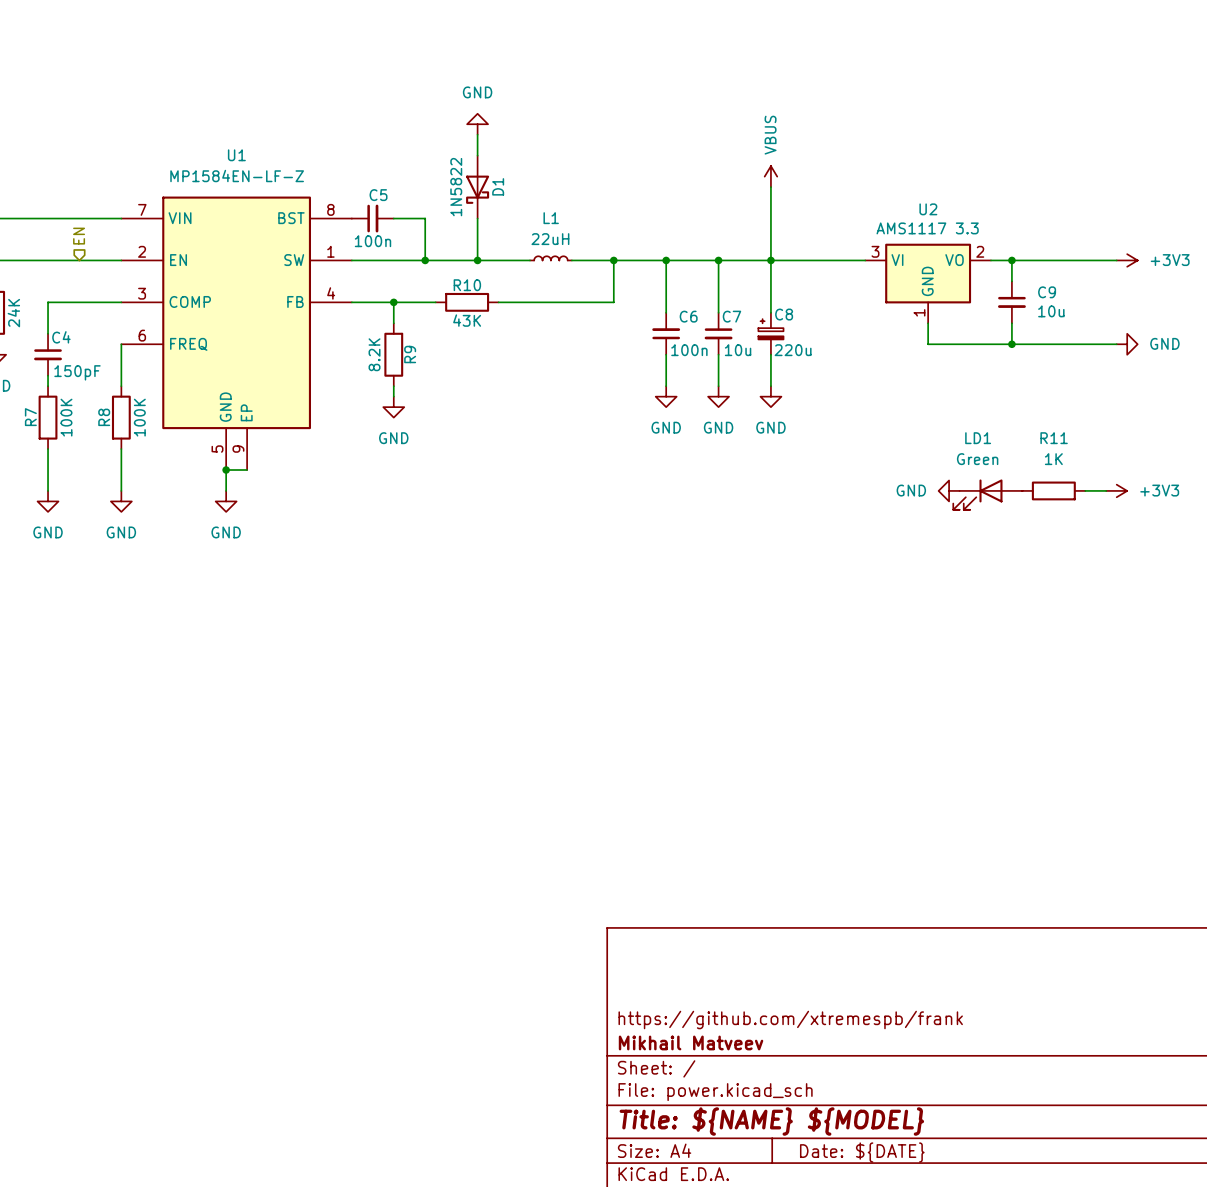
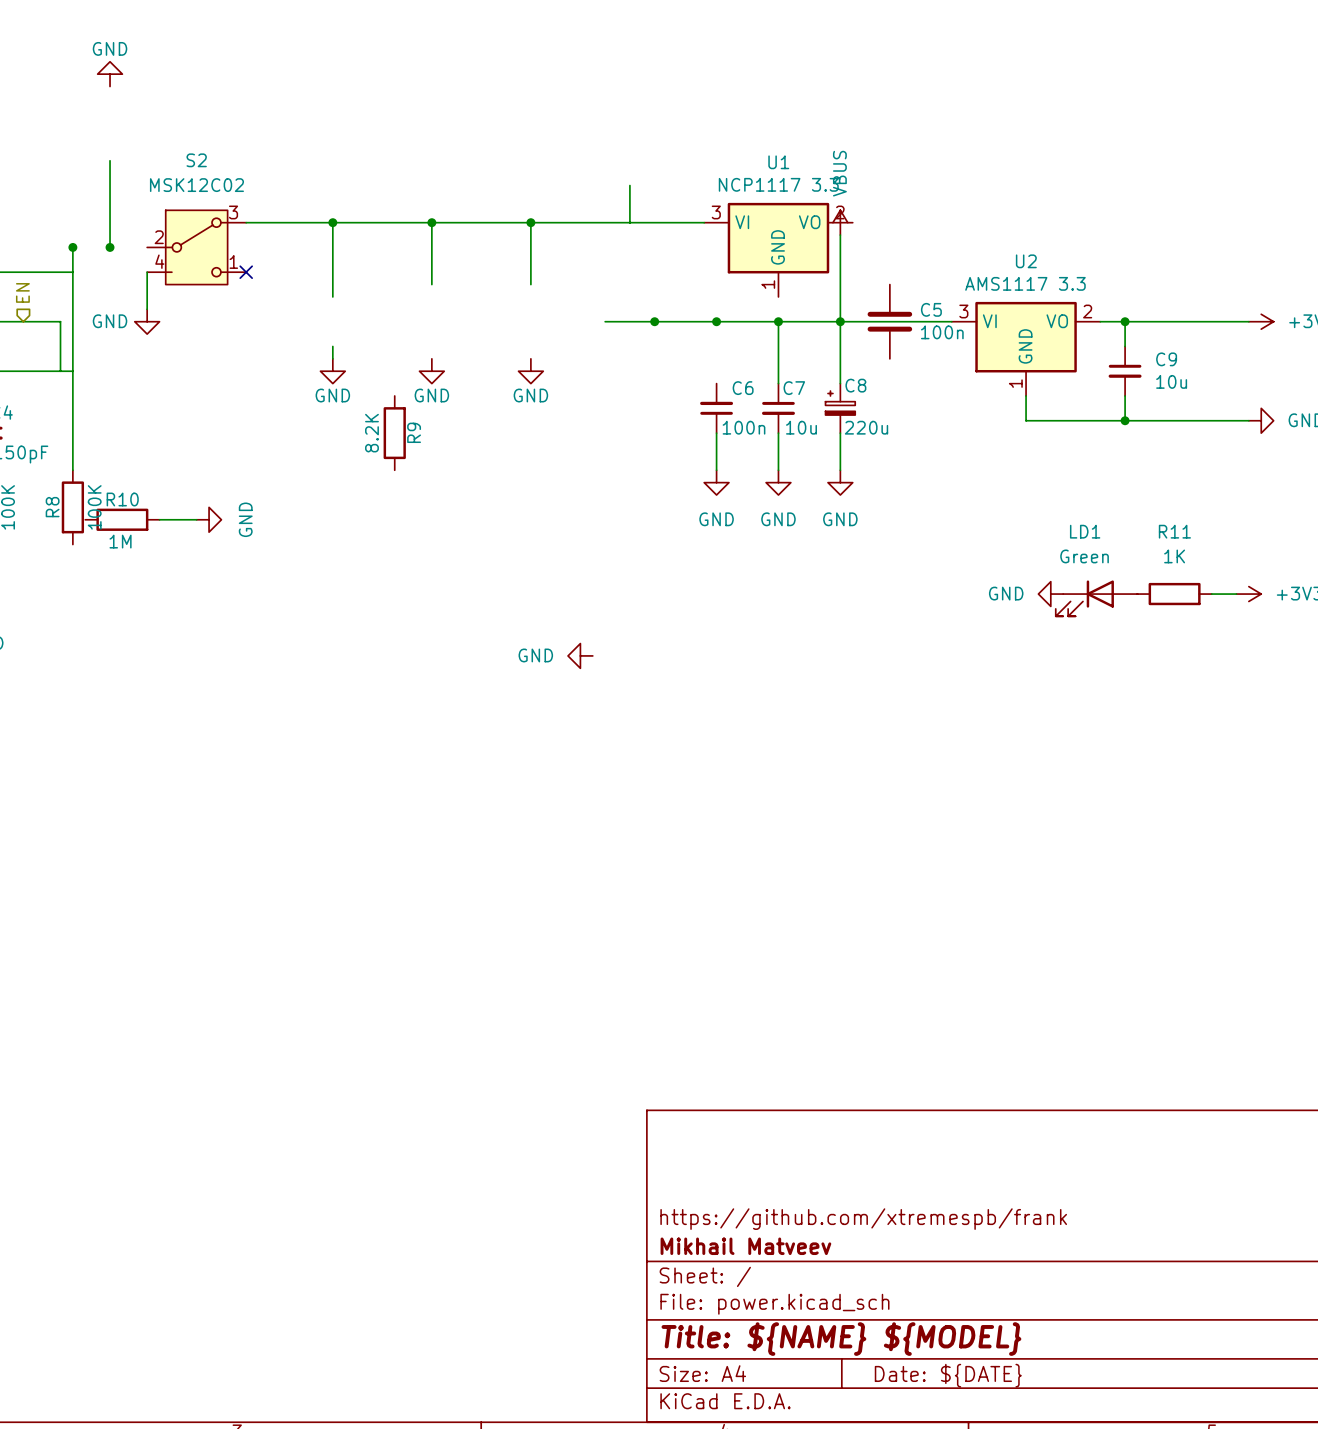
power symbol: none -> GND (110, 74)
wire: none -> (110, 160) (110, 247)
power symbol: GND (477, 124) -> none
wire: (477, 134) (477, 155) -> none
U1 name position: U1 (236, 155) -> U1 (778, 162)
U1 value: MP1584EN-LF-Z (237, 175) -> NCP1117 3.3 (778, 184)
wire: none -> (246, 222) (704, 222)
wire: none -> (332, 222) (332, 296)
junction: none -> (332, 222)
junction: none -> (431, 222)
junction: none -> (530, 222)
D1: 1N5822 (477, 187) -> none
C5 name position: C5 (378, 195) -> C5 (931, 309)
U1 symbol: [121, 196, 352, 471] -> [704, 202, 853, 297]
wire: none -> (72, 247) (72, 420)
junction: none -> (72, 247)
junction: none -> (110, 247)
S2: none -> MSK12C02 (196, 247)
C5 symbol: [351, 204, 394, 233] -> [867, 284, 913, 359]
no-connect mark: none -> (246, 272)
wire: (393, 218) (425, 218) -> (431, 222) (431, 272)
wire: (477, 218) (477, 260) -> none
wire: (425, 229) (425, 260) -> (629, 185) (629, 222)
C5 value position: 100n (372, 241) -> 100n (942, 332)
L1: 22uH (550, 258) -> none
wire: (110, 260) (121, 260) -> (60, 321) (60, 371)
power symbol: none -> GND (147, 321)
wire: (351, 260) (529, 260) -> none
junction: (425, 260) -> none
junction: (477, 260) -> none
wire: (613, 260) (613, 302) (498, 302) -> none
wire: (666, 260) (666, 312) -> (530, 222) (530, 284)
power symbol: none -> GND (332, 371)
wire: (351, 302) (435, 302) -> none
wire: (393, 302) (393, 323) -> none
junction: (393, 302) -> none
power symbol: none -> GND (431, 371)
R10 position: (467, 302) -> (122, 519)
power symbol: none -> GND (530, 371)
R10 value: 43K (467, 320) -> 1M (120, 541)
wire: (393, 386) (393, 396) -> (332, 346) (332, 358)
power symbol: GND (393, 407) -> none
power symbol: none -> GND (209, 519)
wire: (121, 449) (121, 490) -> none
junction: (226, 470) -> none
wire: (247, 470) (226, 470) (226, 490) -> none
power symbol: GND (121, 501) -> none
power symbol: GND (226, 501) -> none
power symbol: none -> GND (580, 655)

